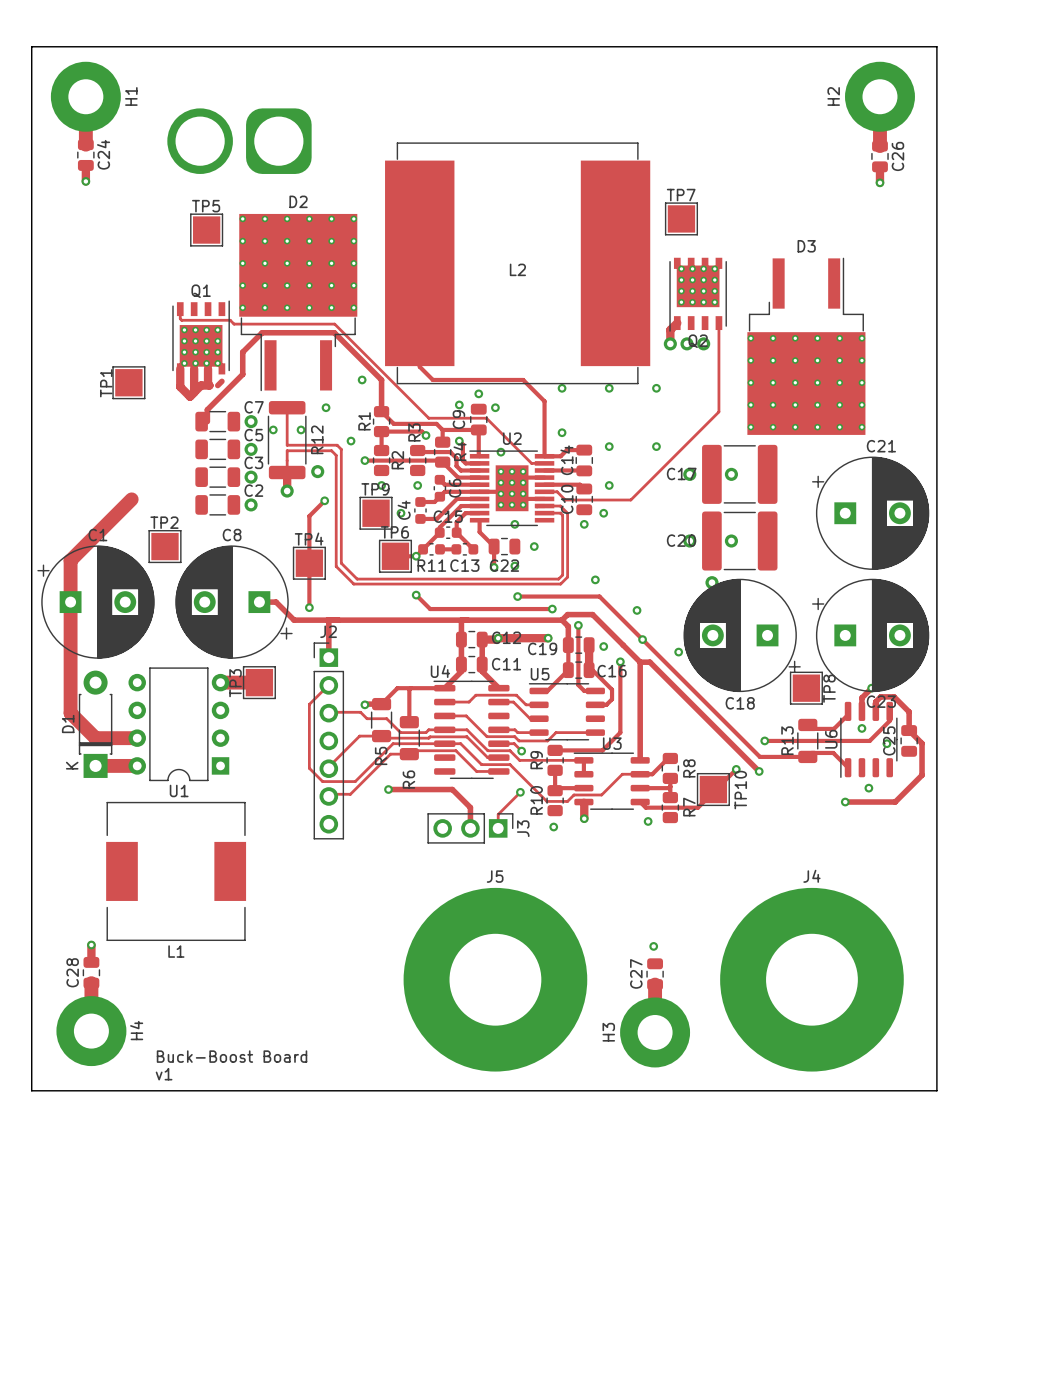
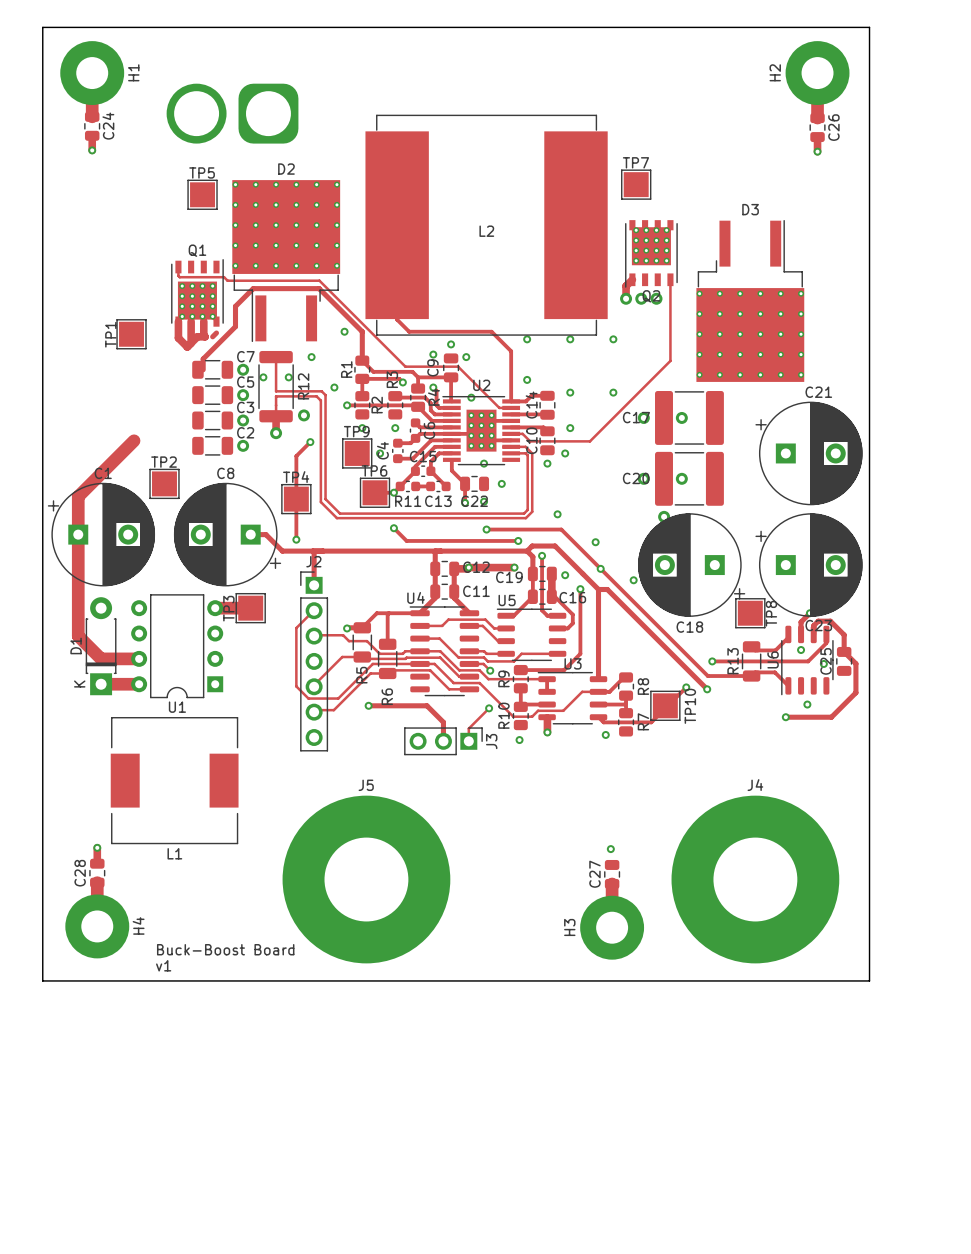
J5 position: (495, 979) -> (366, 879)

